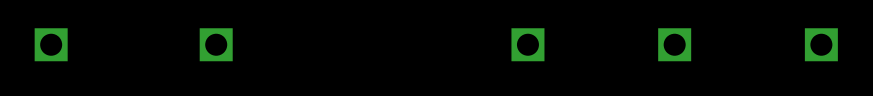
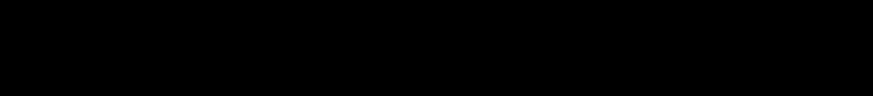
part: (51, 44) -> none
part: (216, 44) -> none
part: (527, 44) -> none
part: (674, 44) -> none
part: (821, 44) -> none

